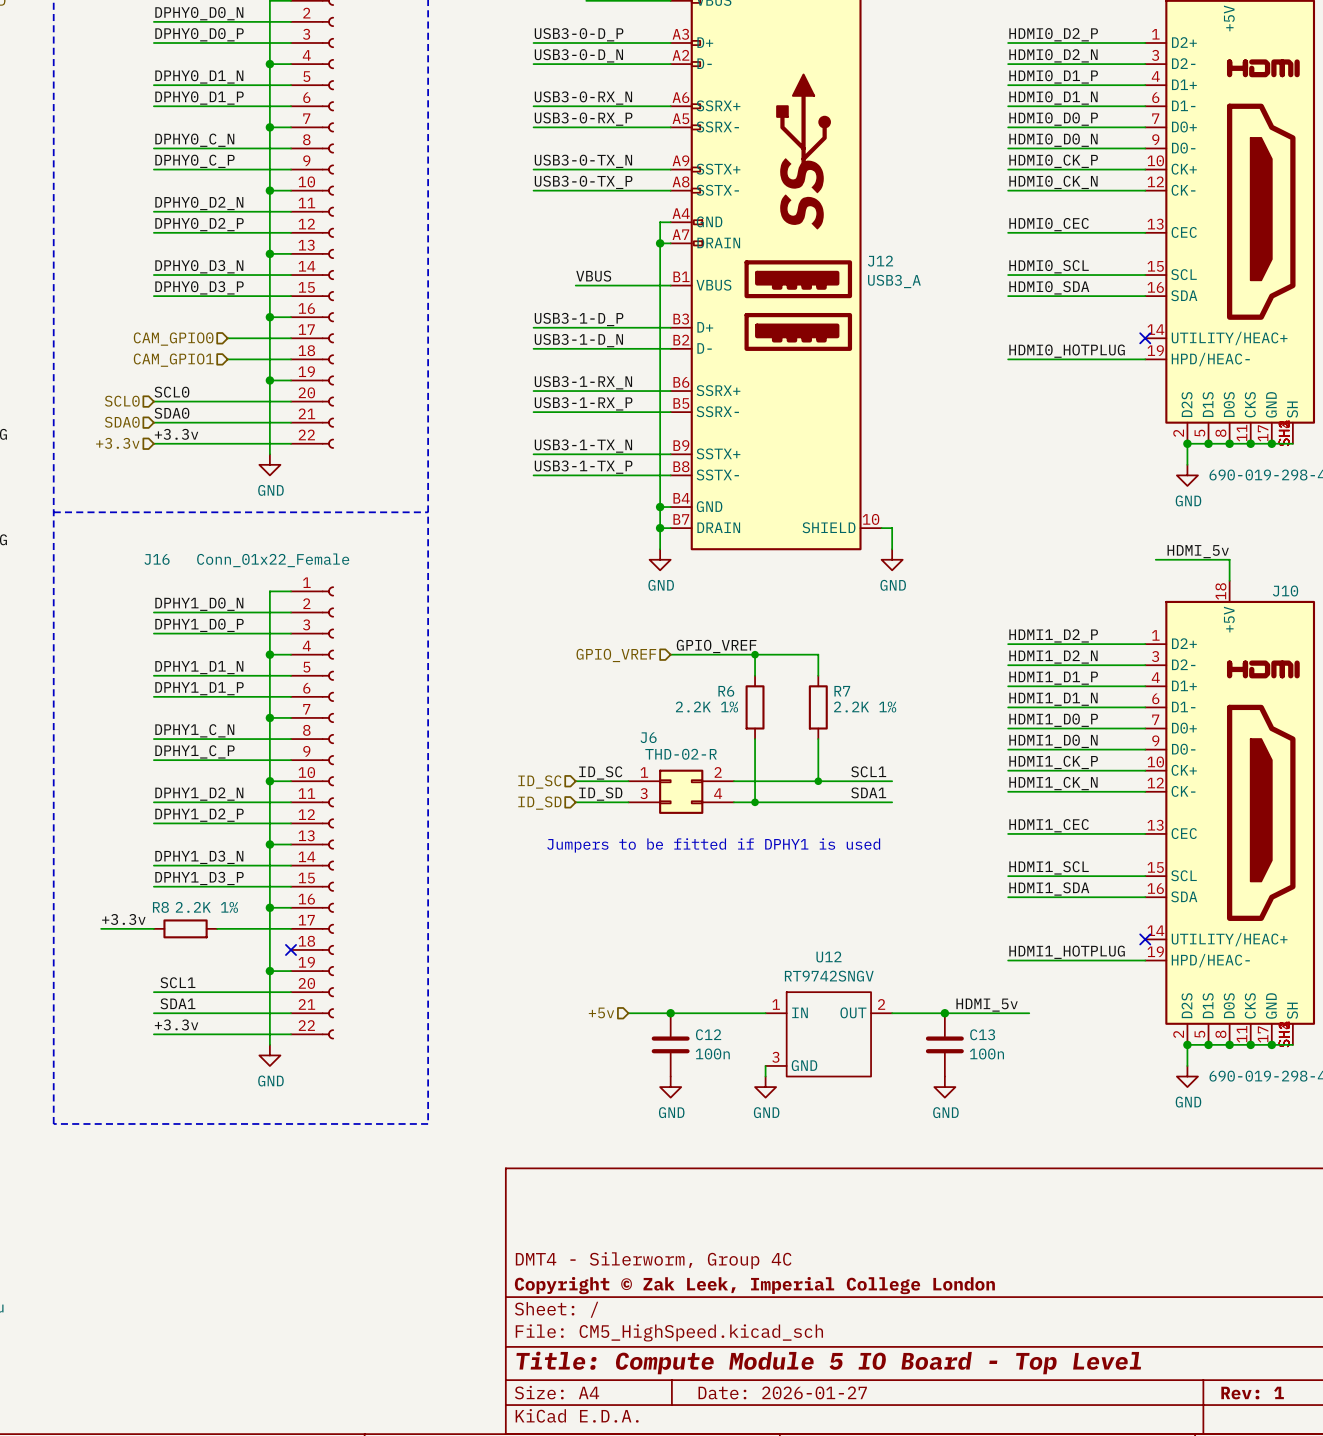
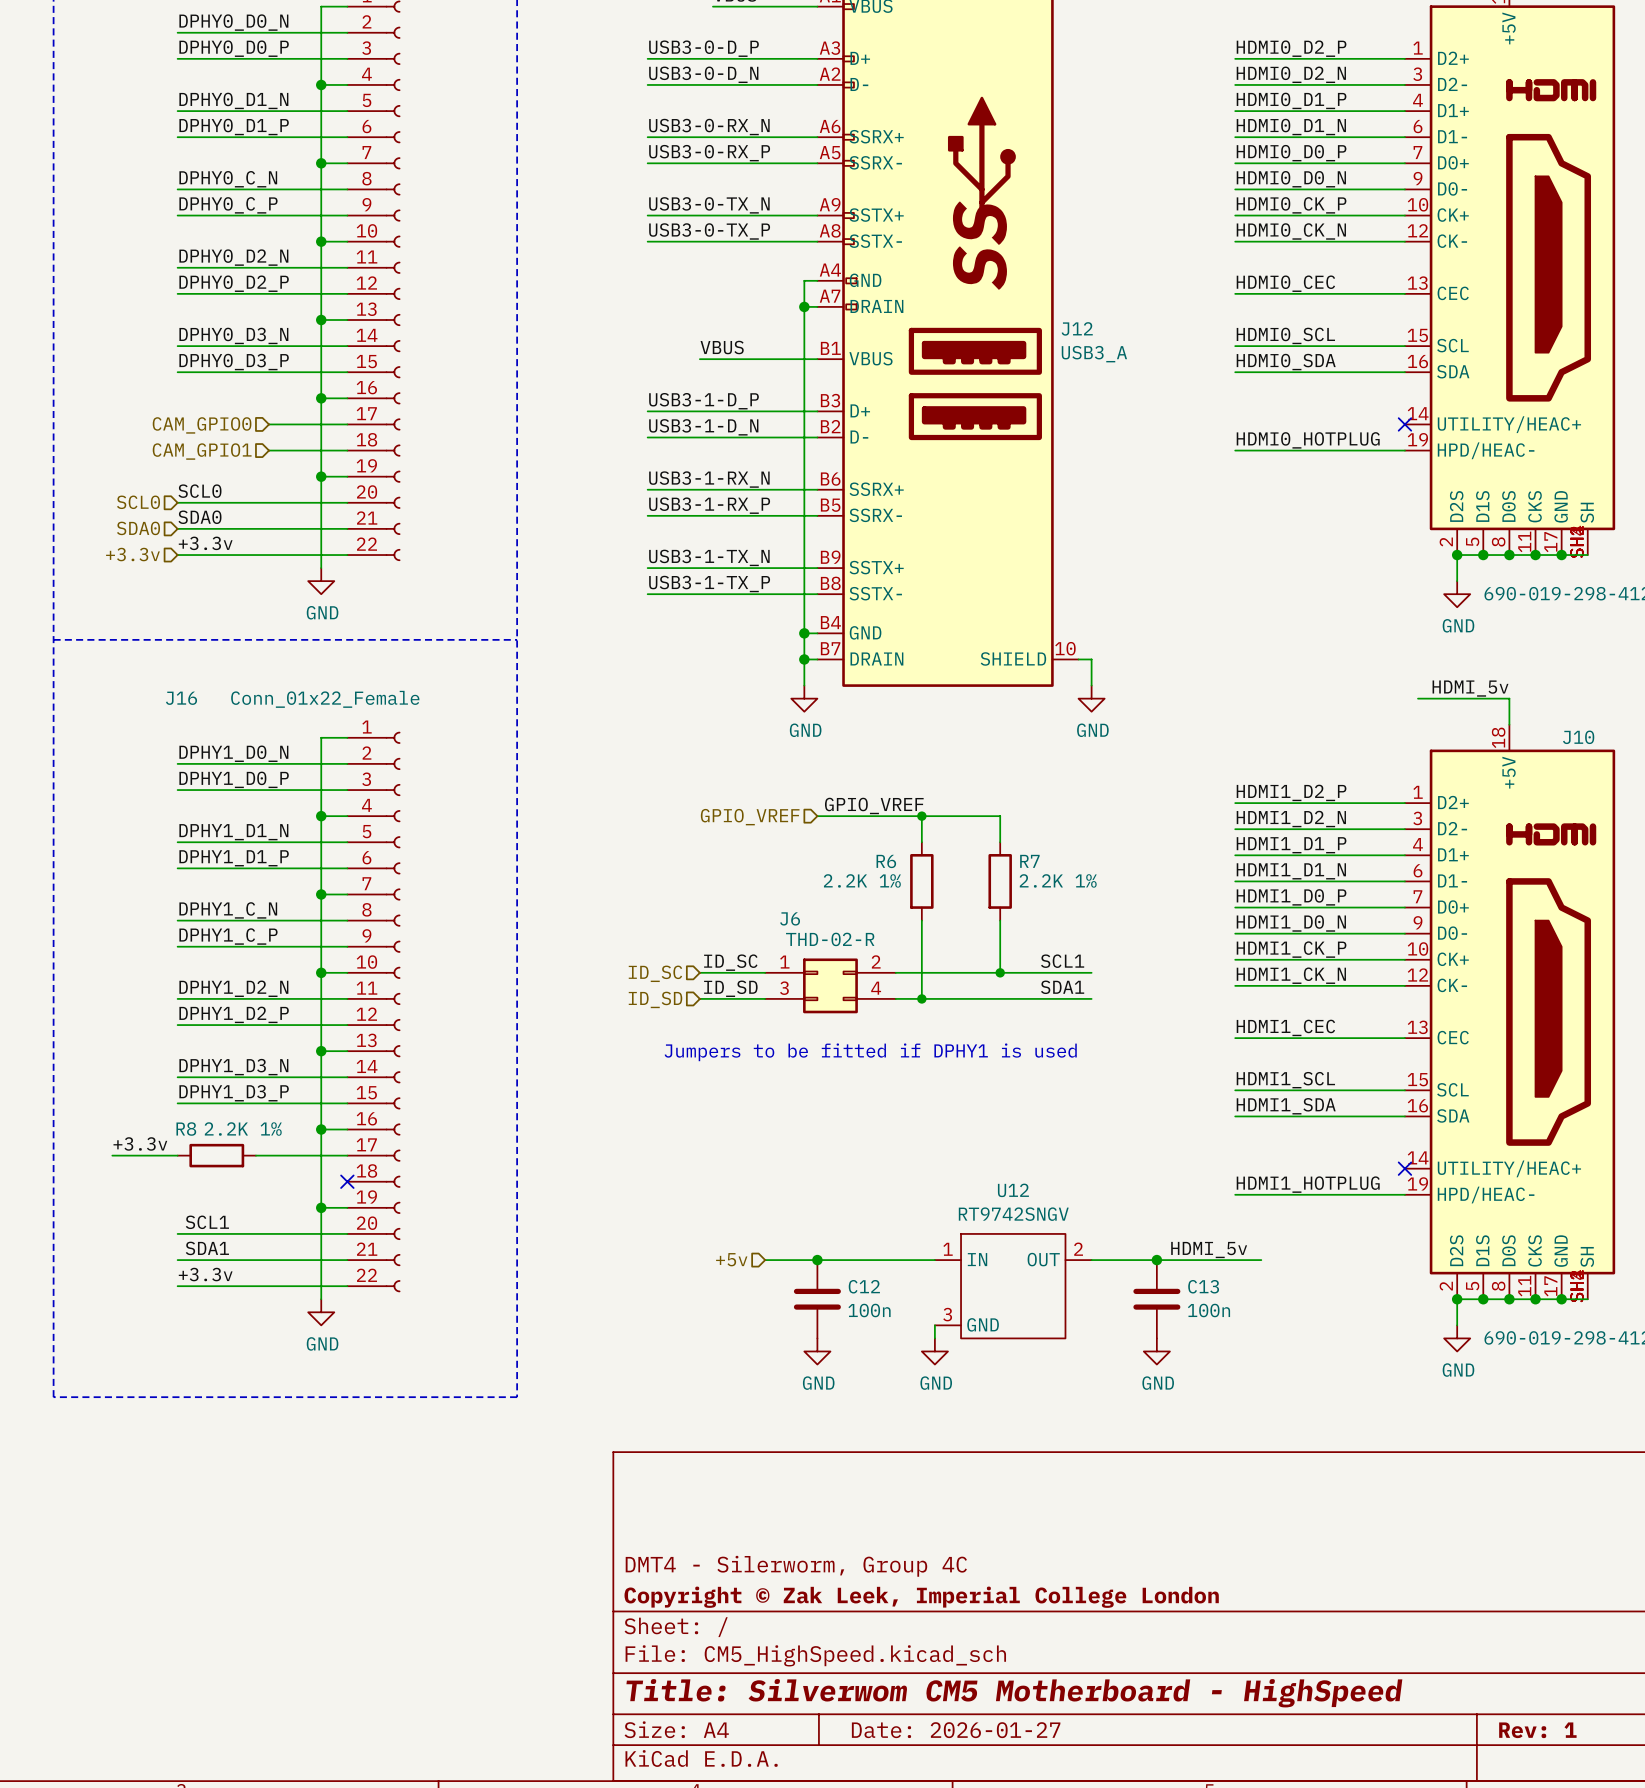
title block: Title: Compute Module 5 IO Board - Top Level (828, 1362) -> Title: Silverwom CM5 Motherboard - HighSpeed (1014, 1693)

